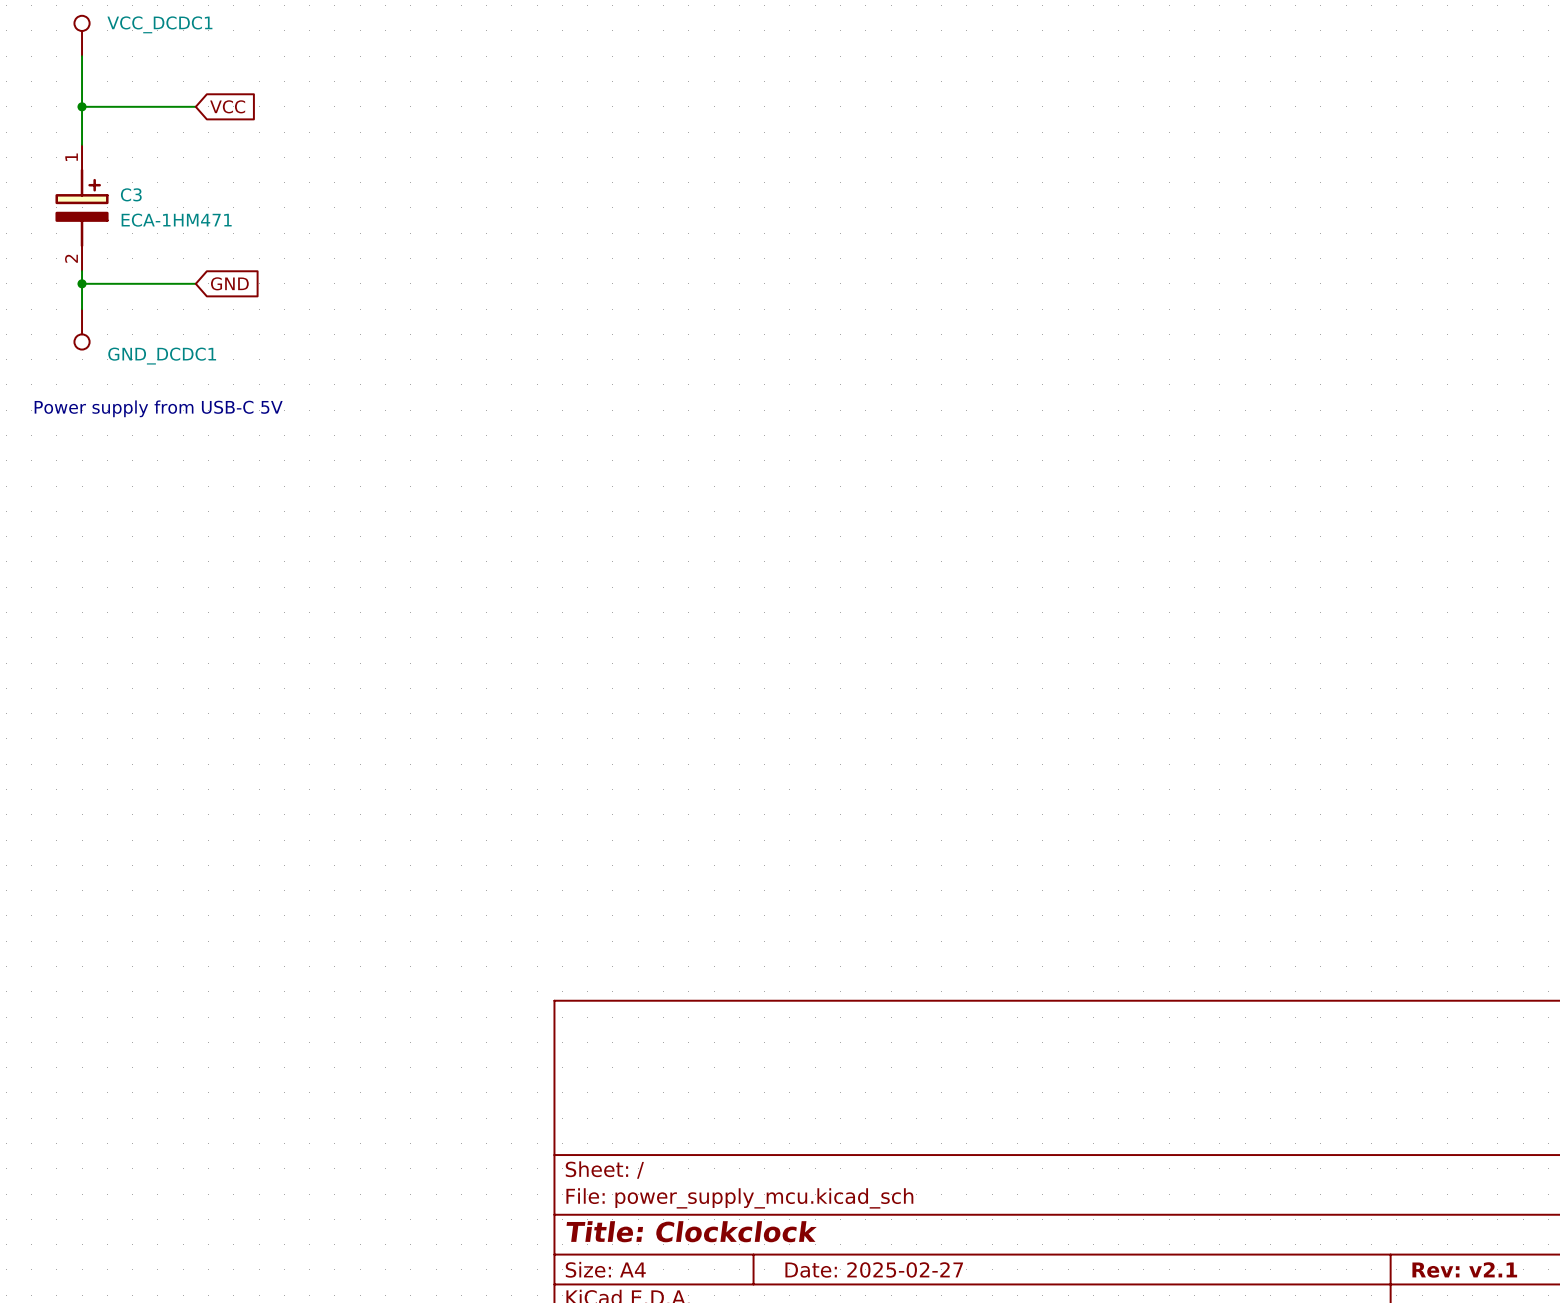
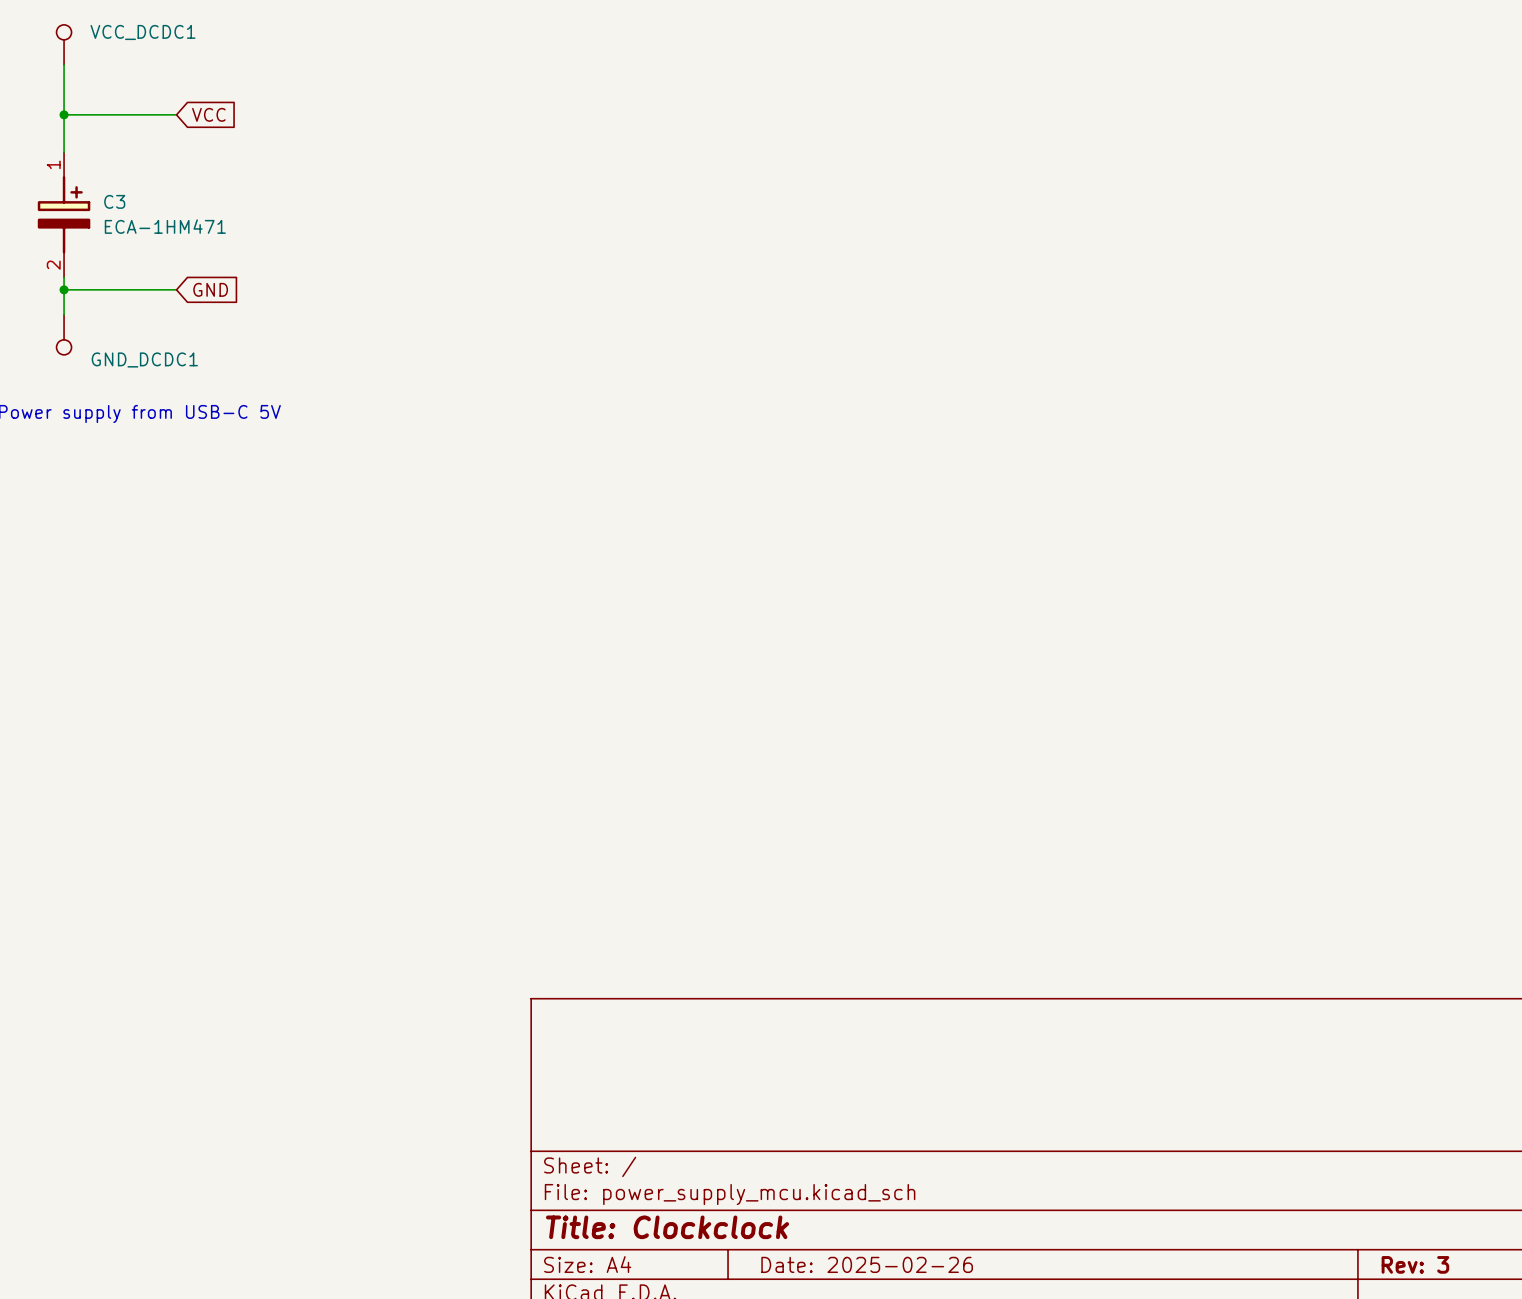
title block: Date: 2025-02-27 (874, 1269) -> Date: 2025-02-26 (867, 1264)
title block: Rev: v2.1 (1464, 1269) -> Rev: 3 (1415, 1264)

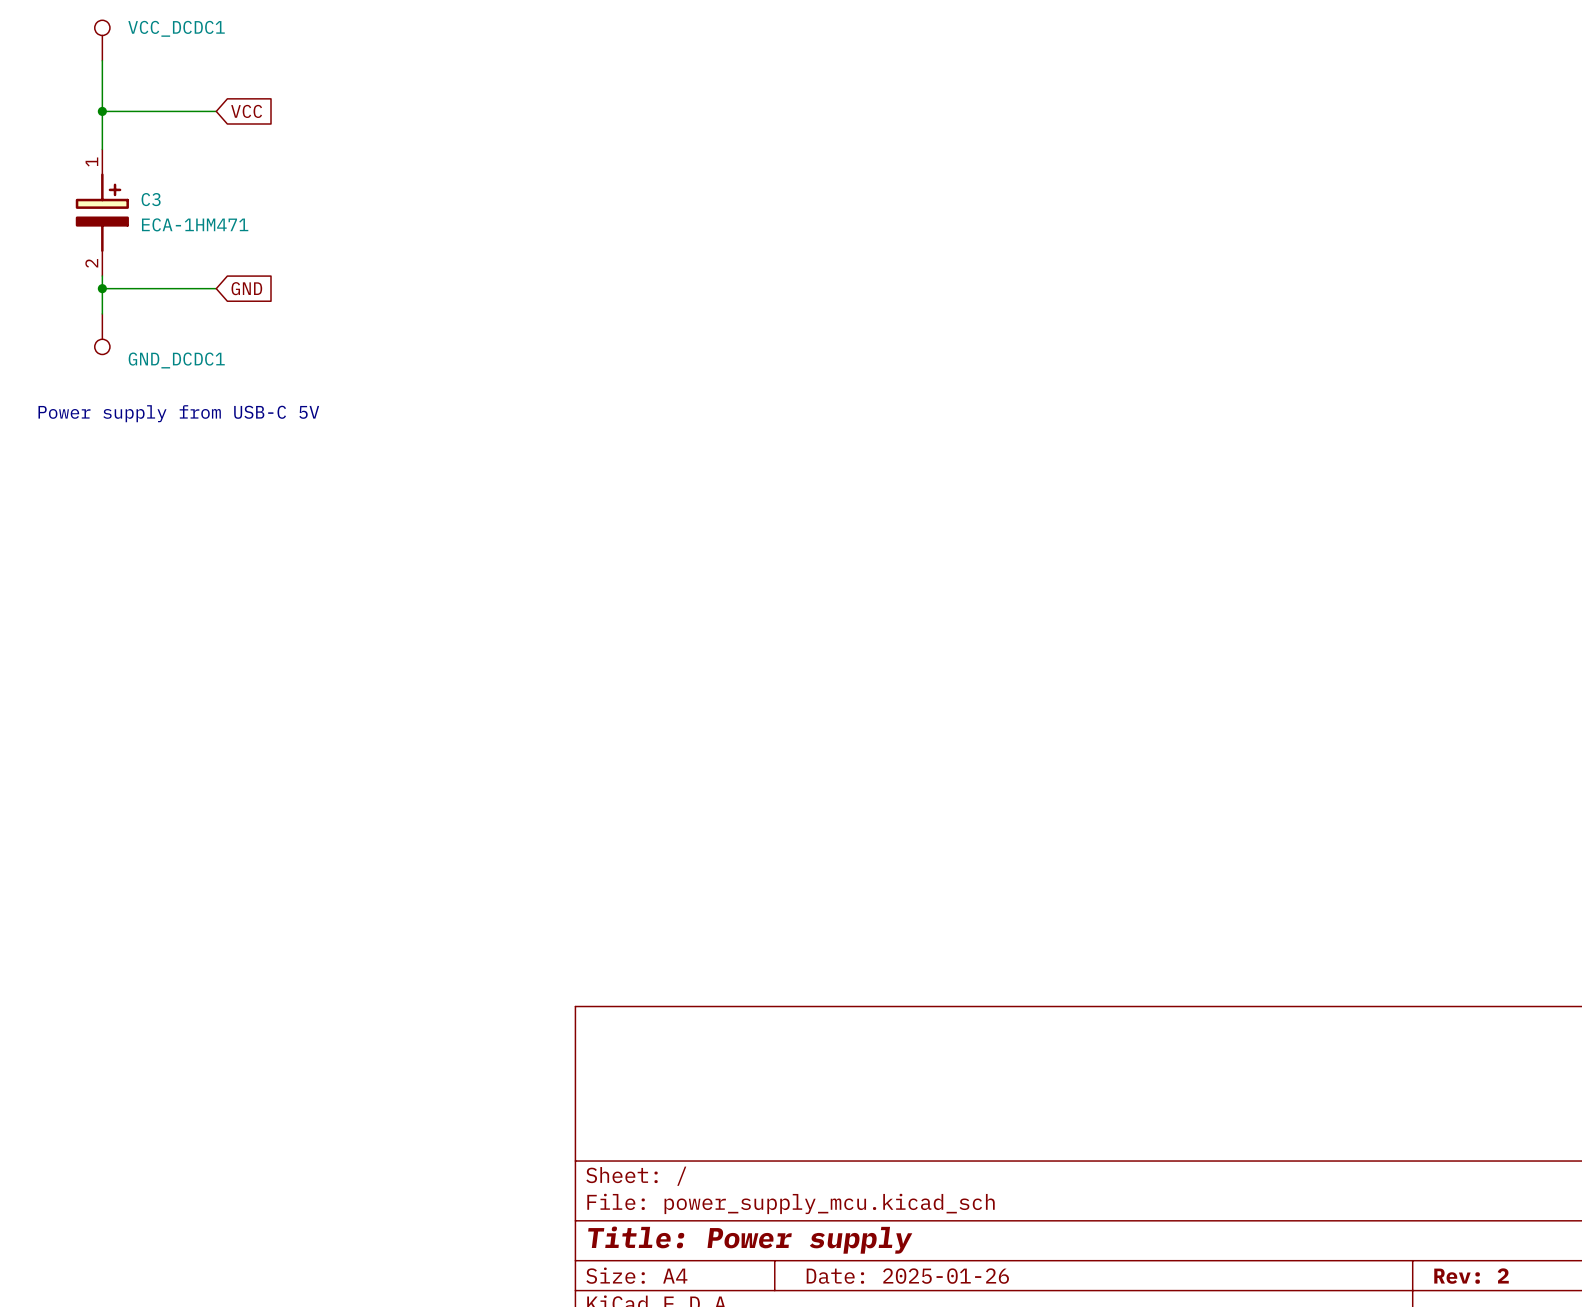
title block: Title: Clockclock (667, 1227) -> Title: Power supply (750, 1240)
title block: Date: 2025-02-26 (867, 1264) -> Date: 2025-01-26 (907, 1276)
title block: Rev: 3 (1415, 1264) -> Rev: 2 (1471, 1276)

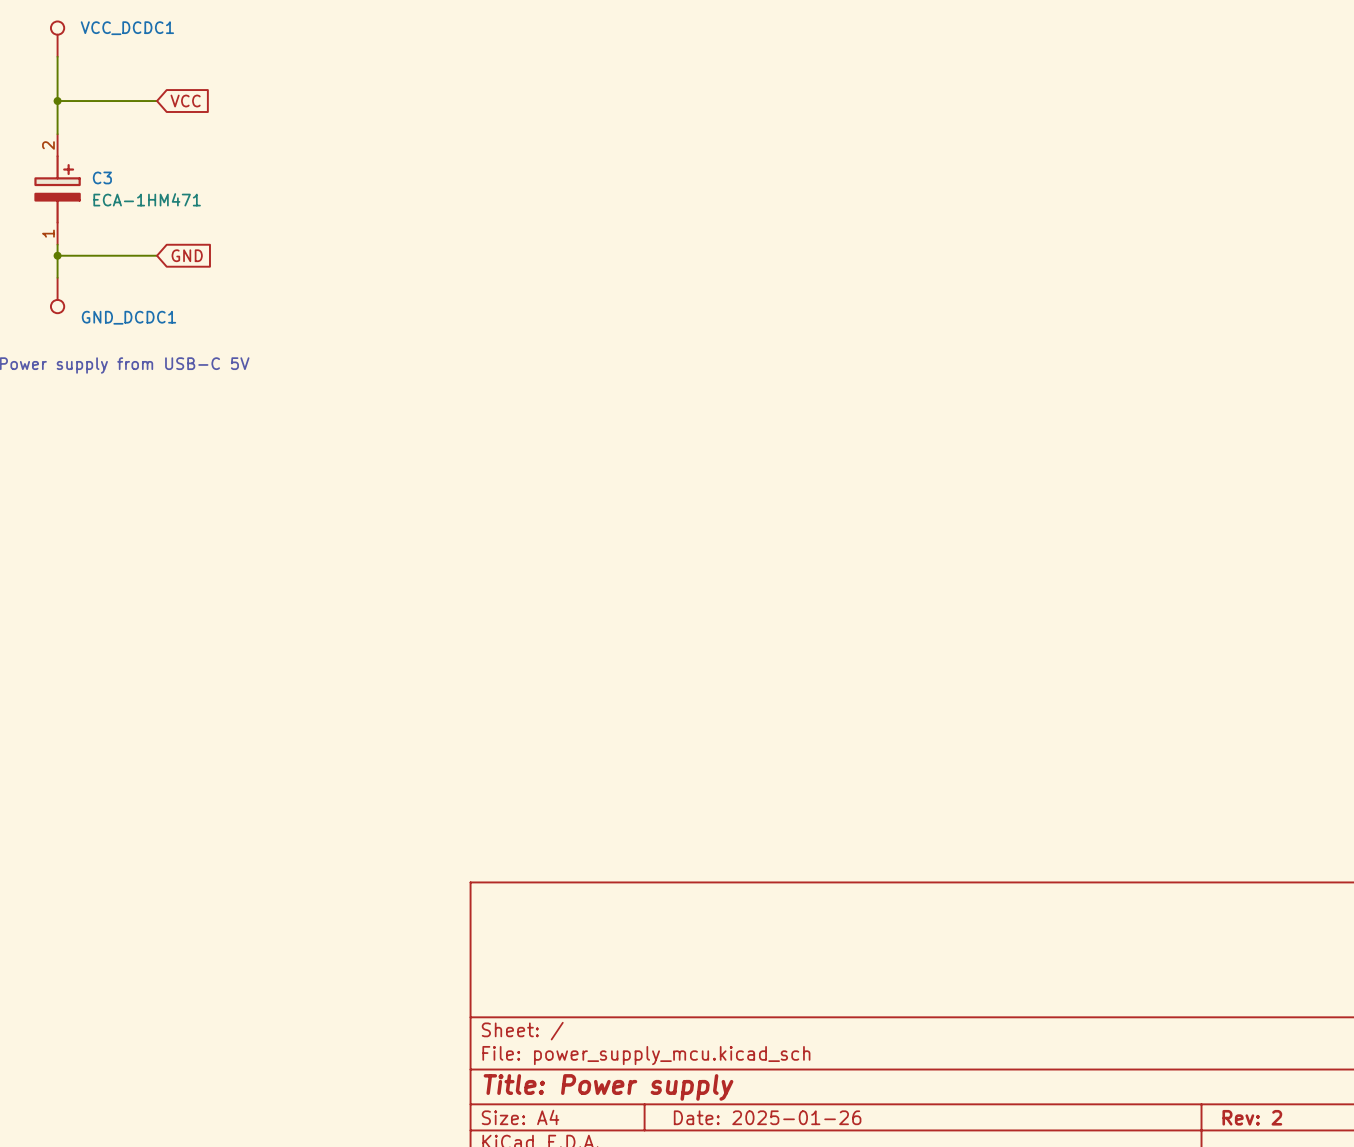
C3 pin number: 1 (91, 162) -> 2 (48, 145)
C3 pin number: 2 (91, 263) -> 1 (48, 233)

